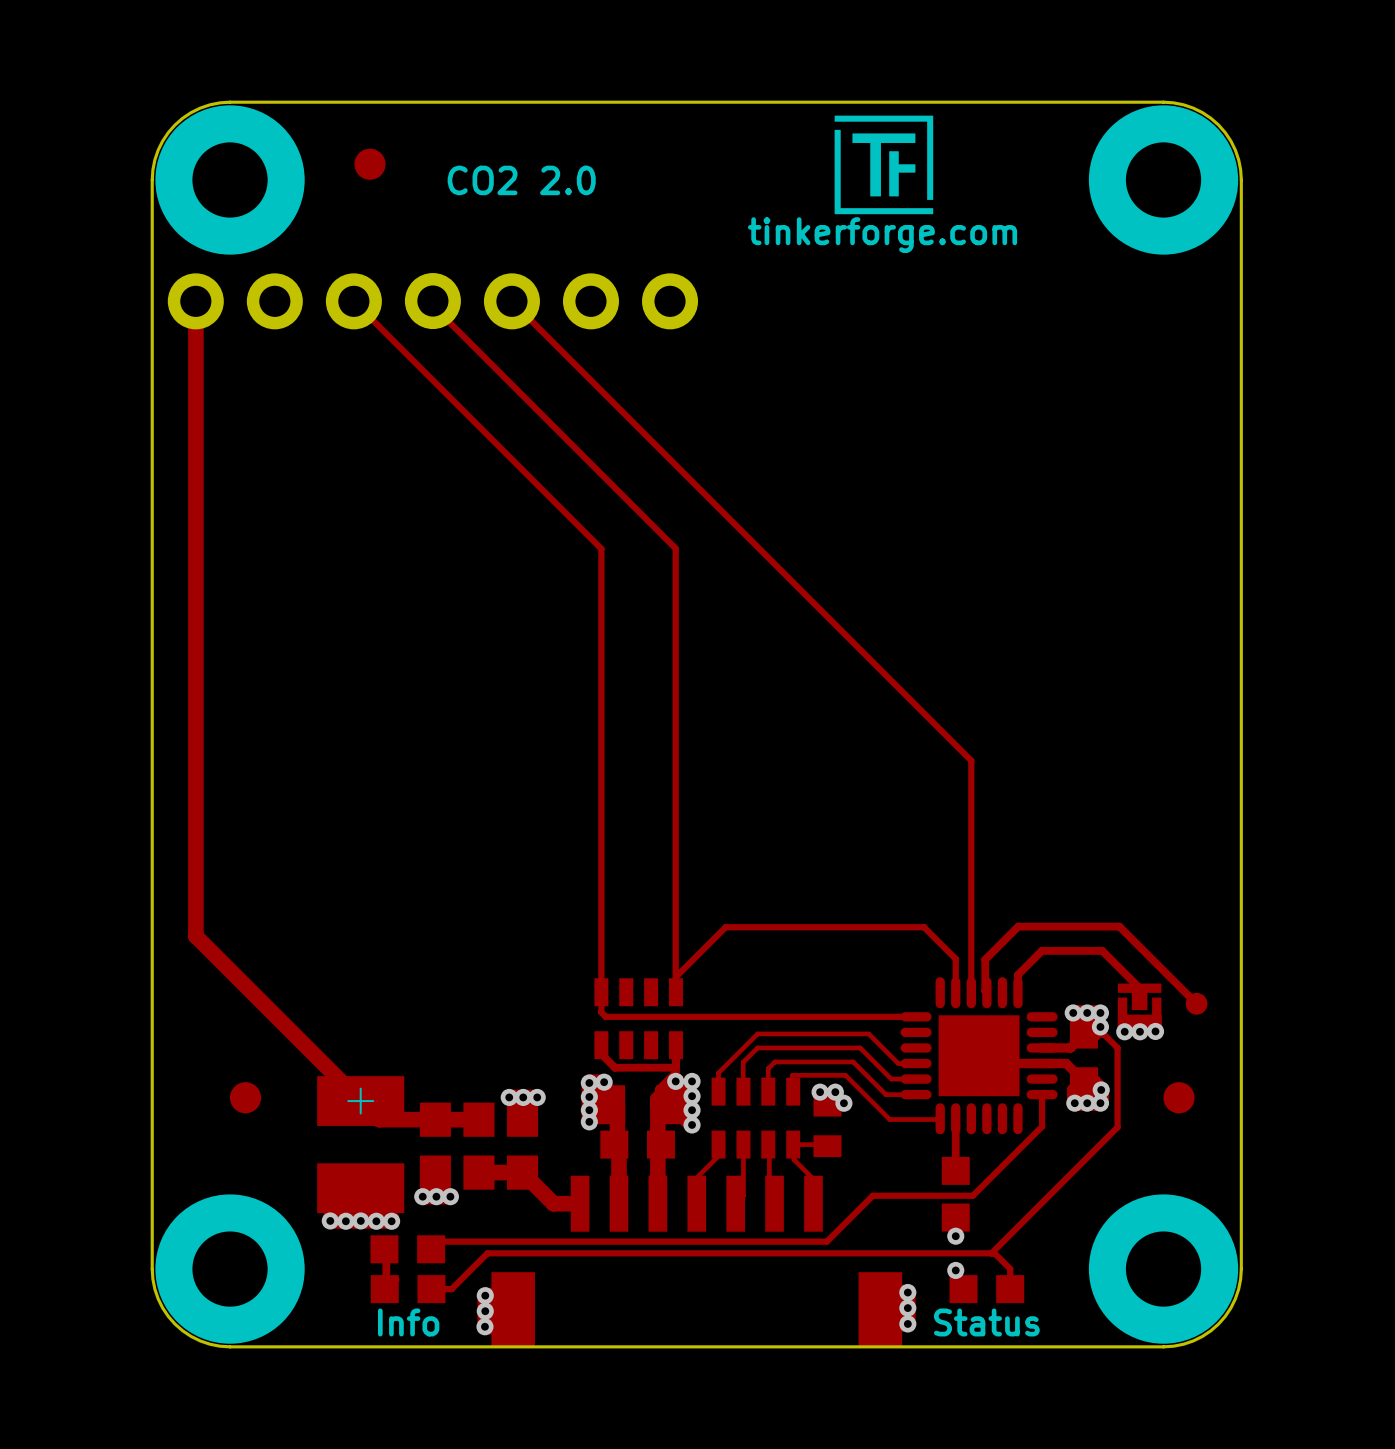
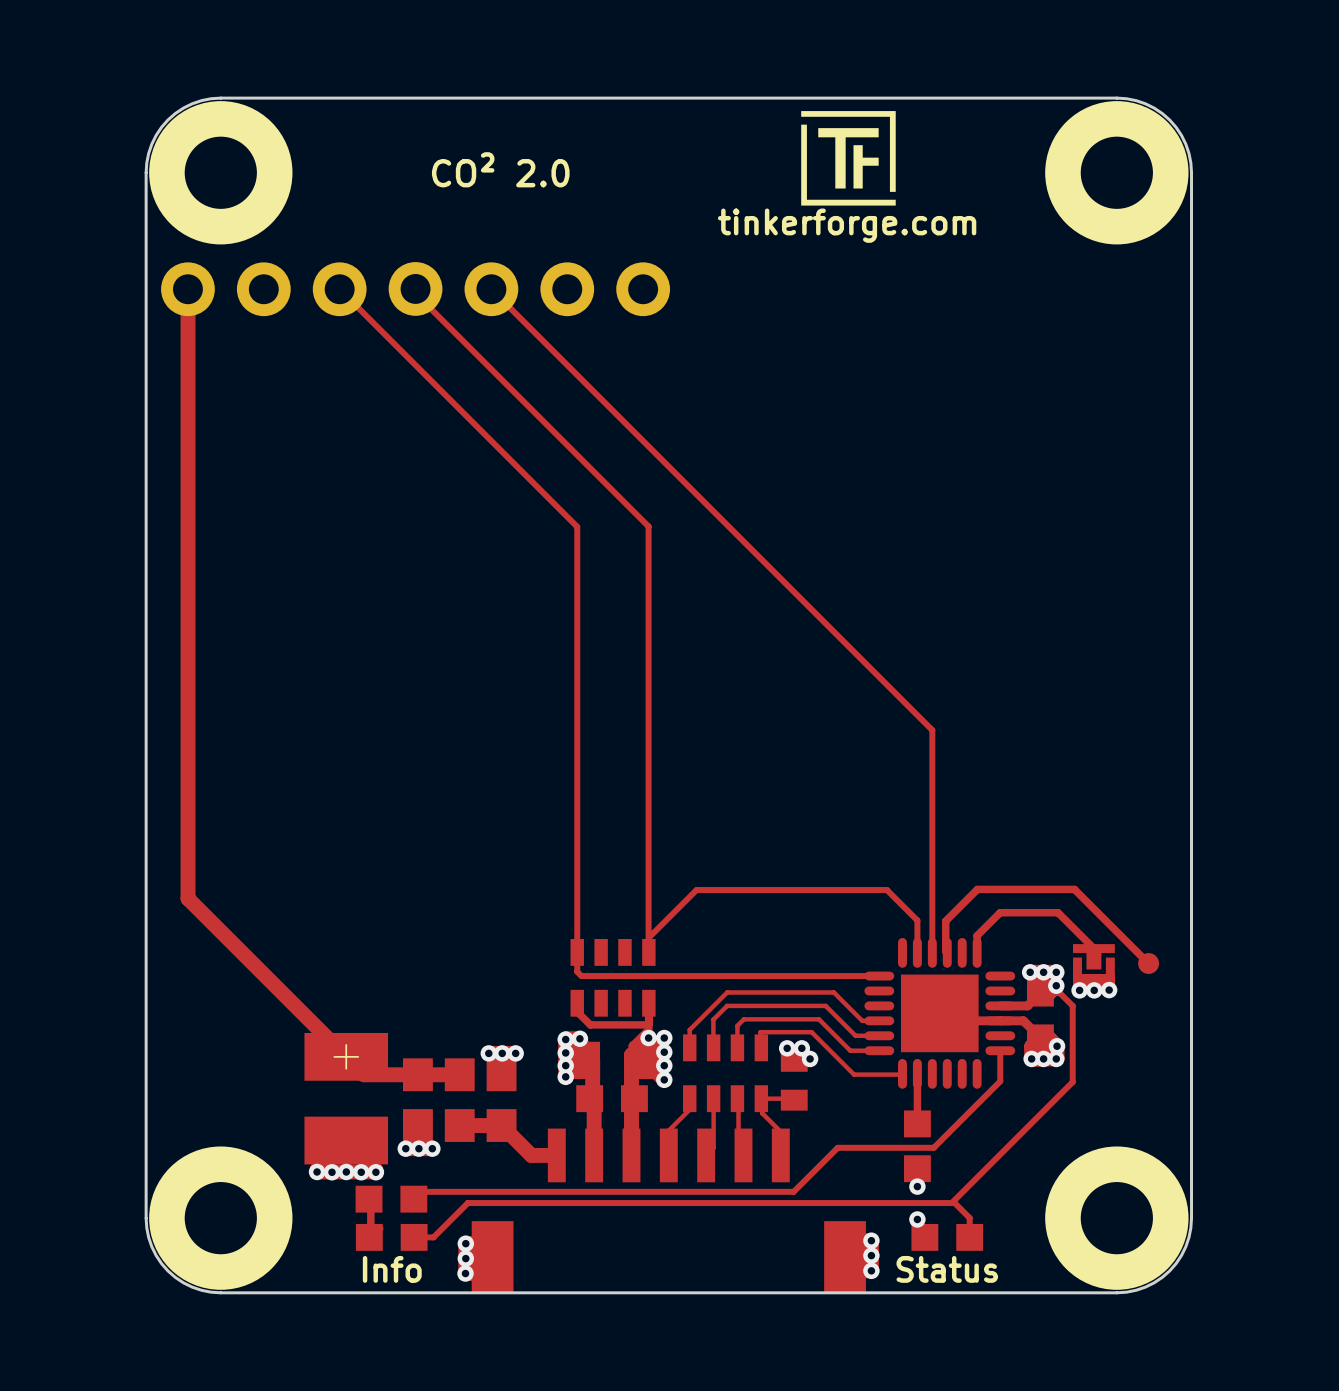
part: (369, 164) -> none
text: CO2 2.0 (521, 180) -> CO² 2.0 (500, 169)
part: (245, 1097) -> none
part: (1179, 1097) -> none

